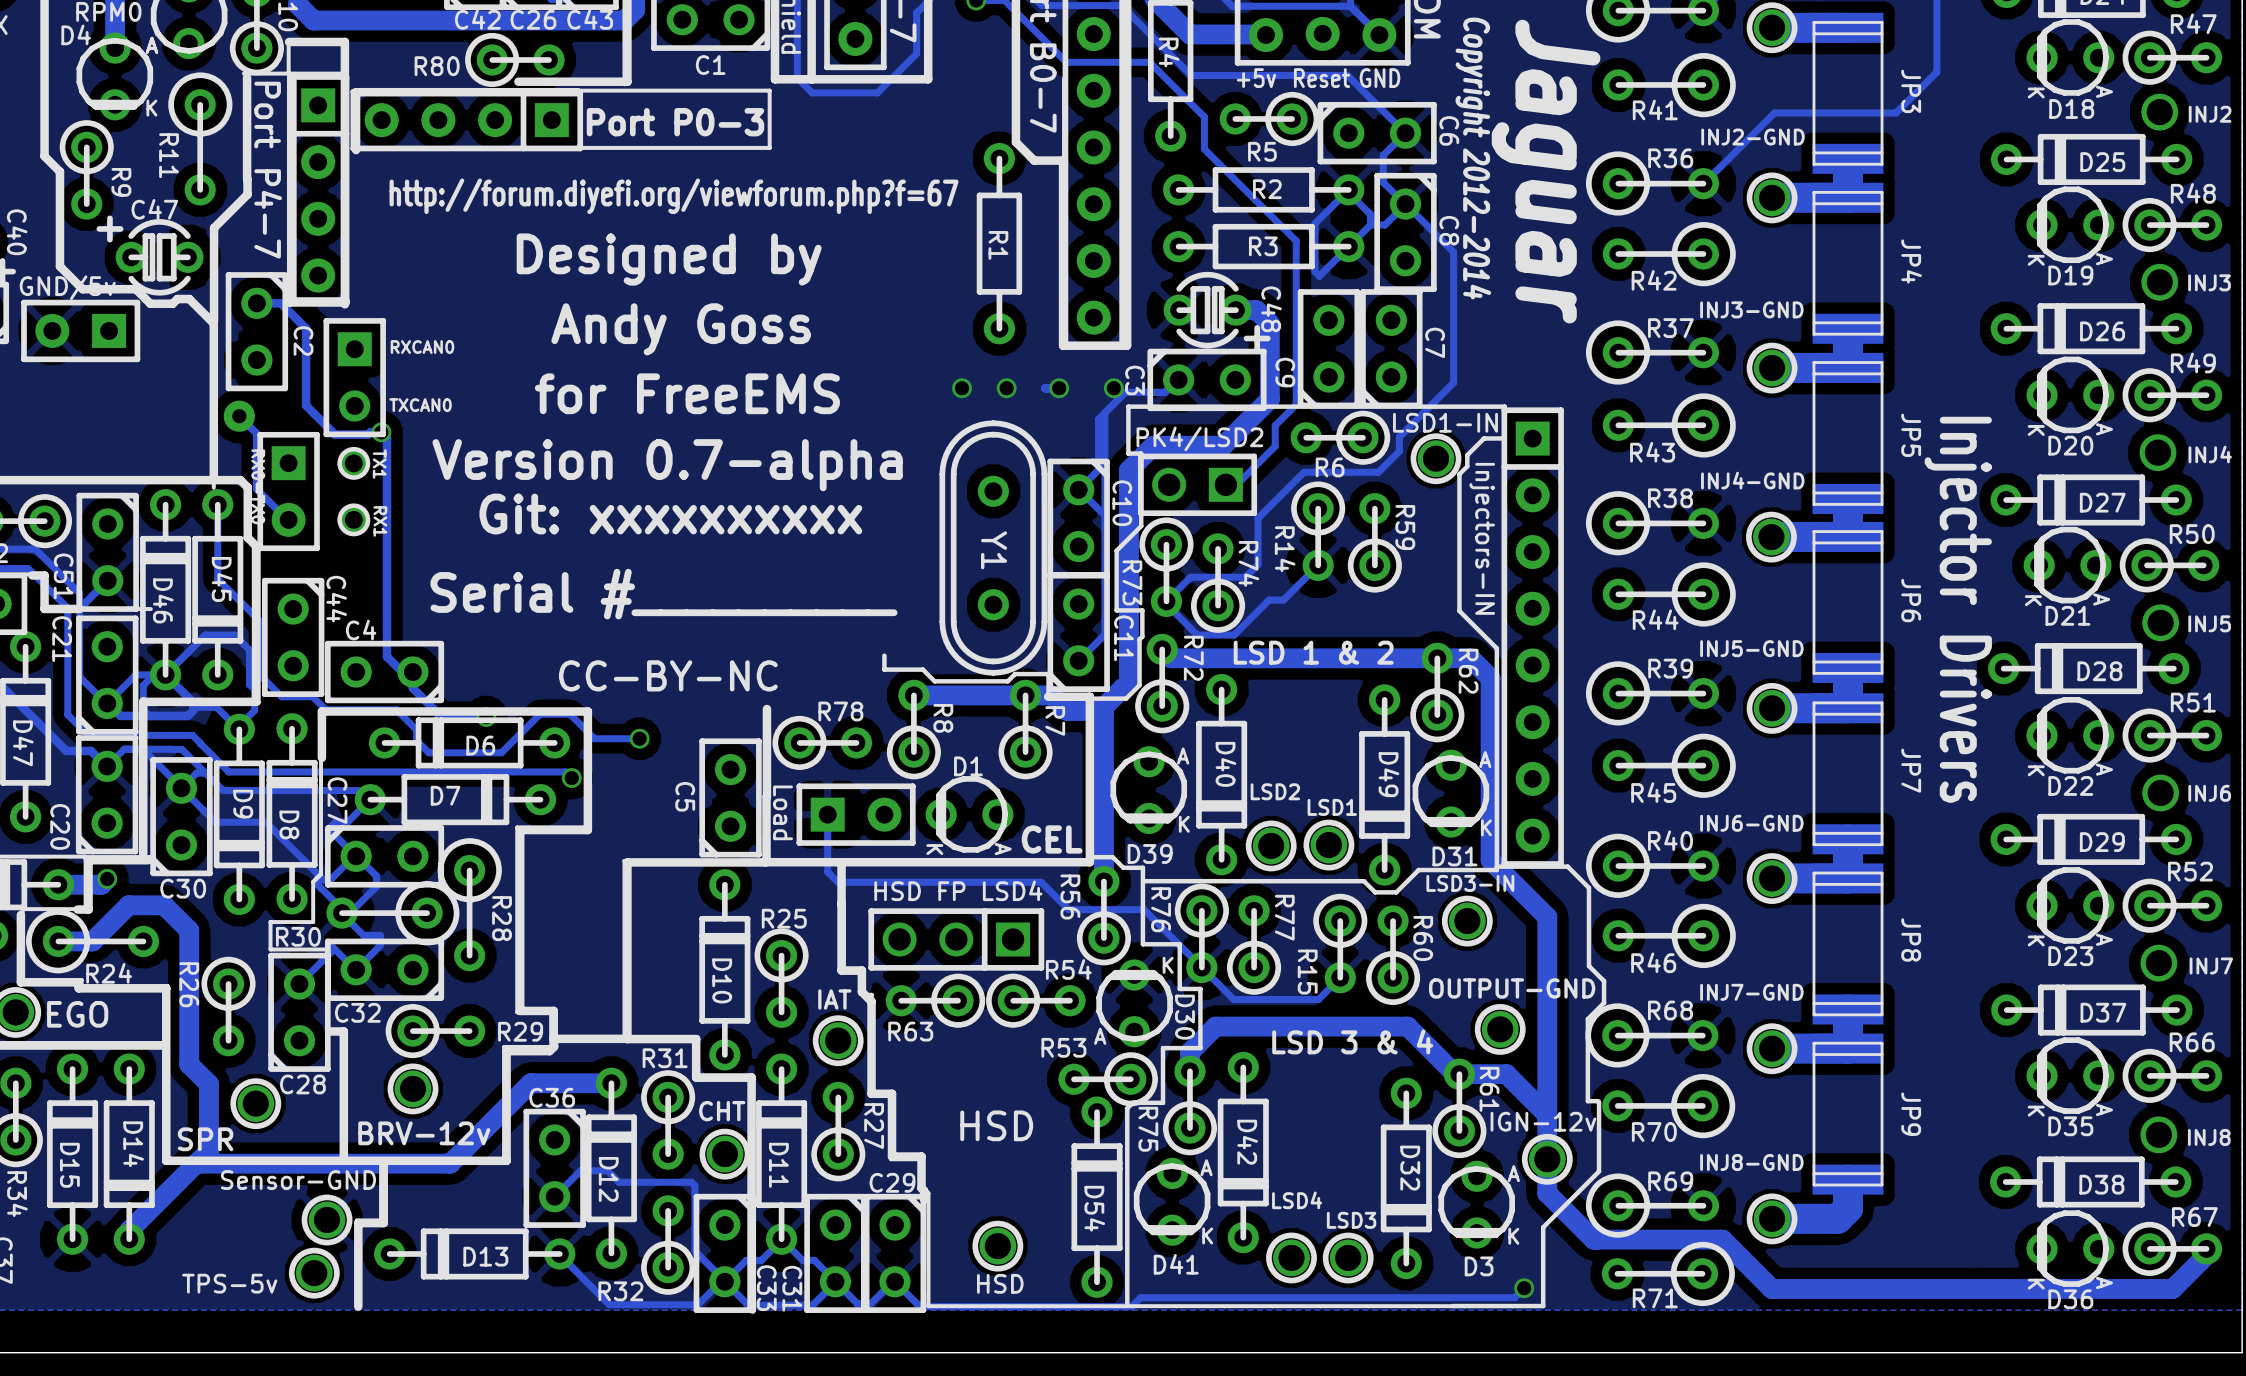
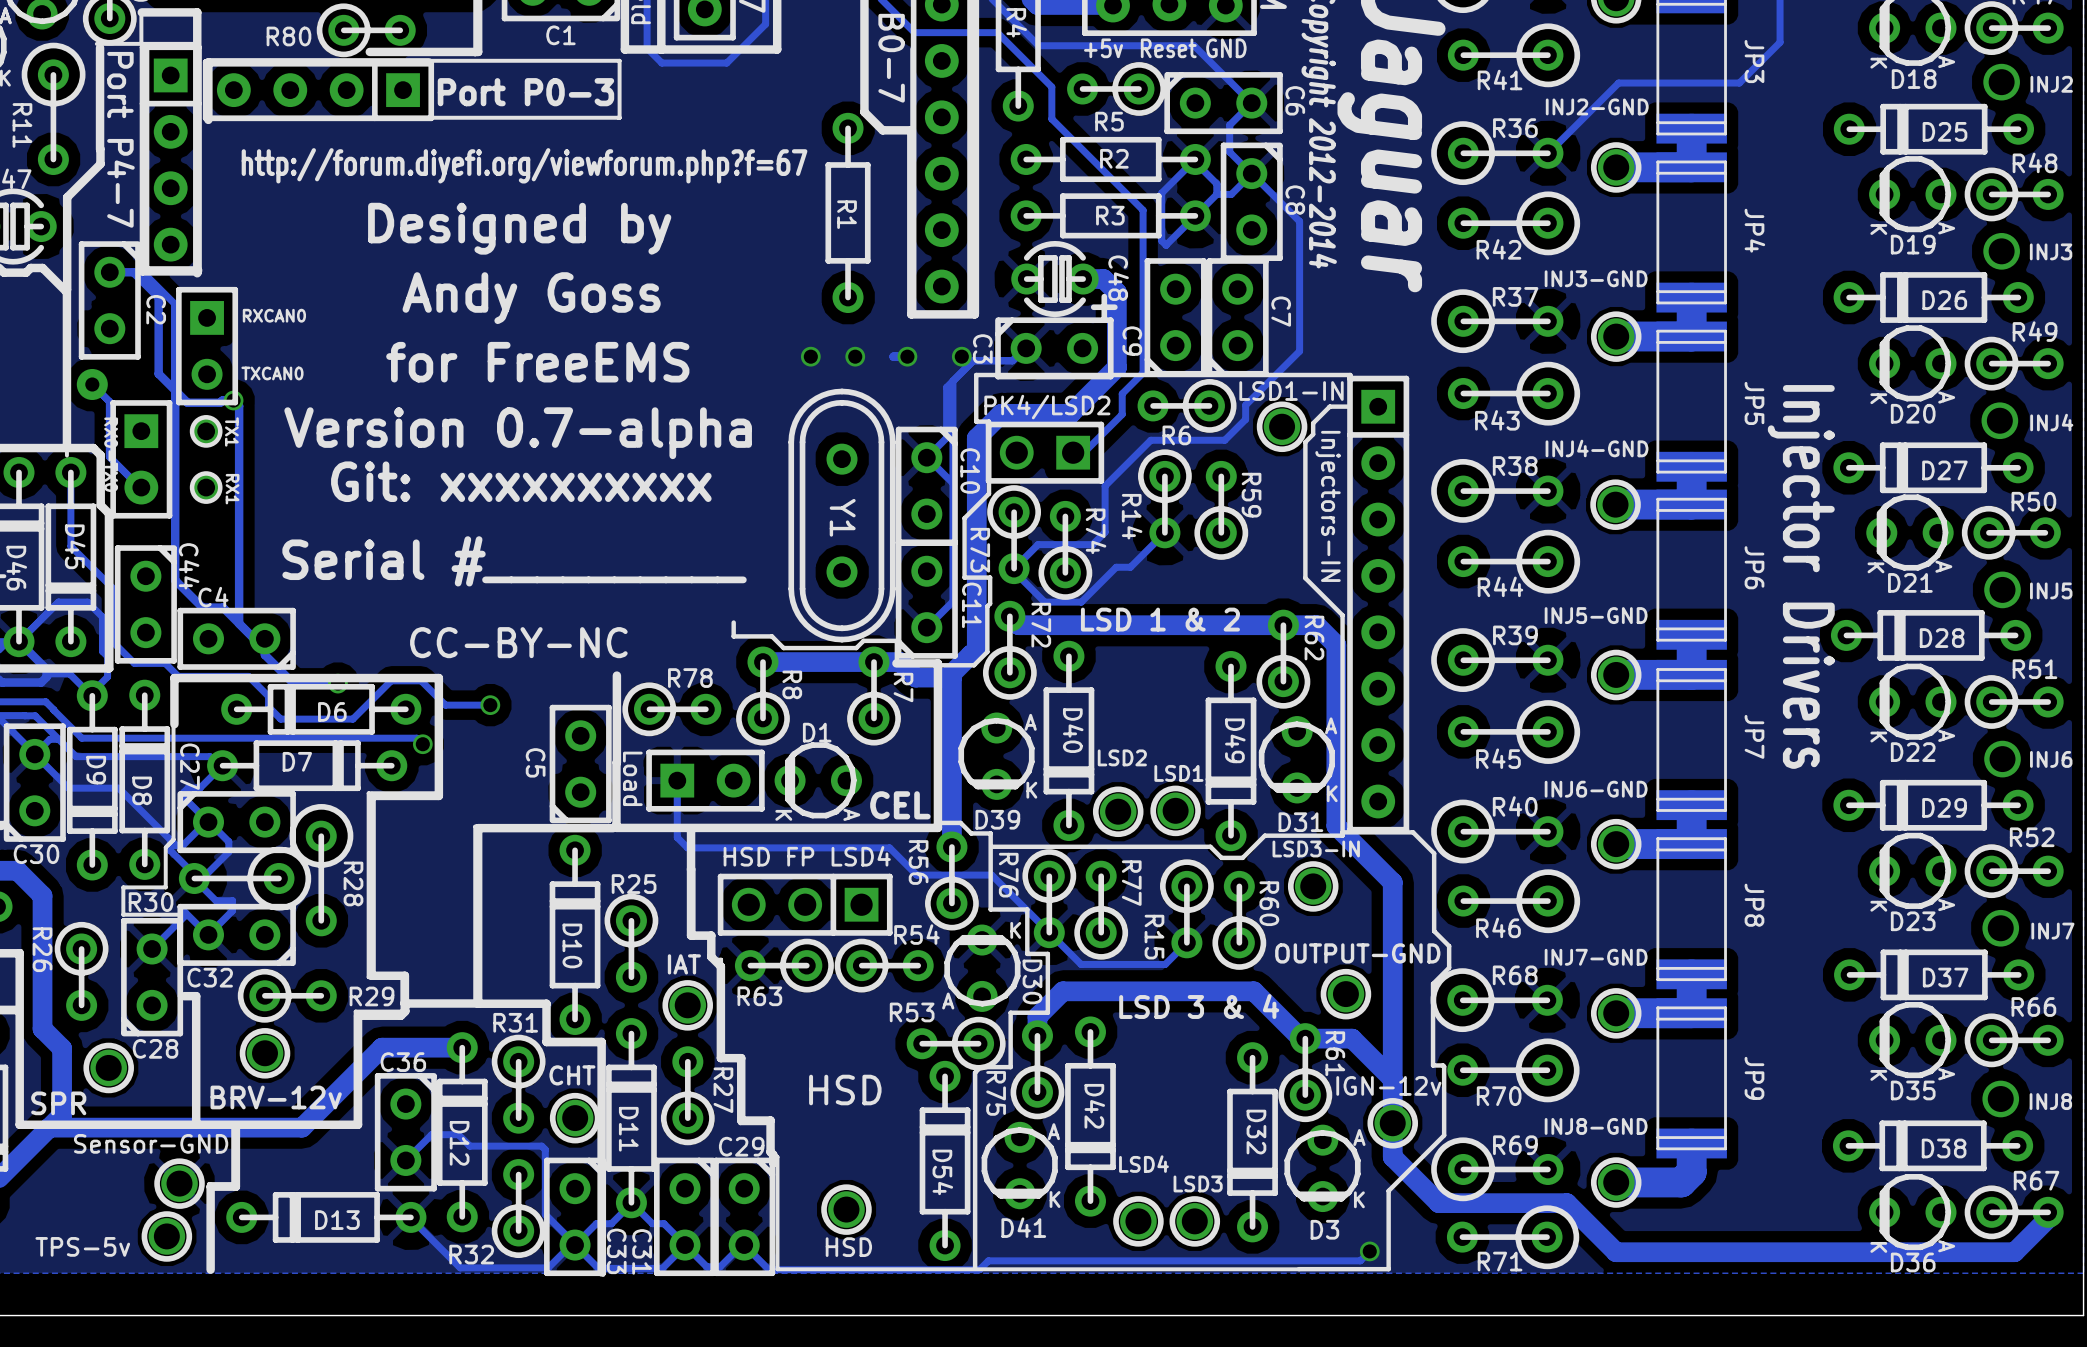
track: none -> (147, 276) (175, 304) (175, 580) (202, 607) (223, 607) (239, 623)

